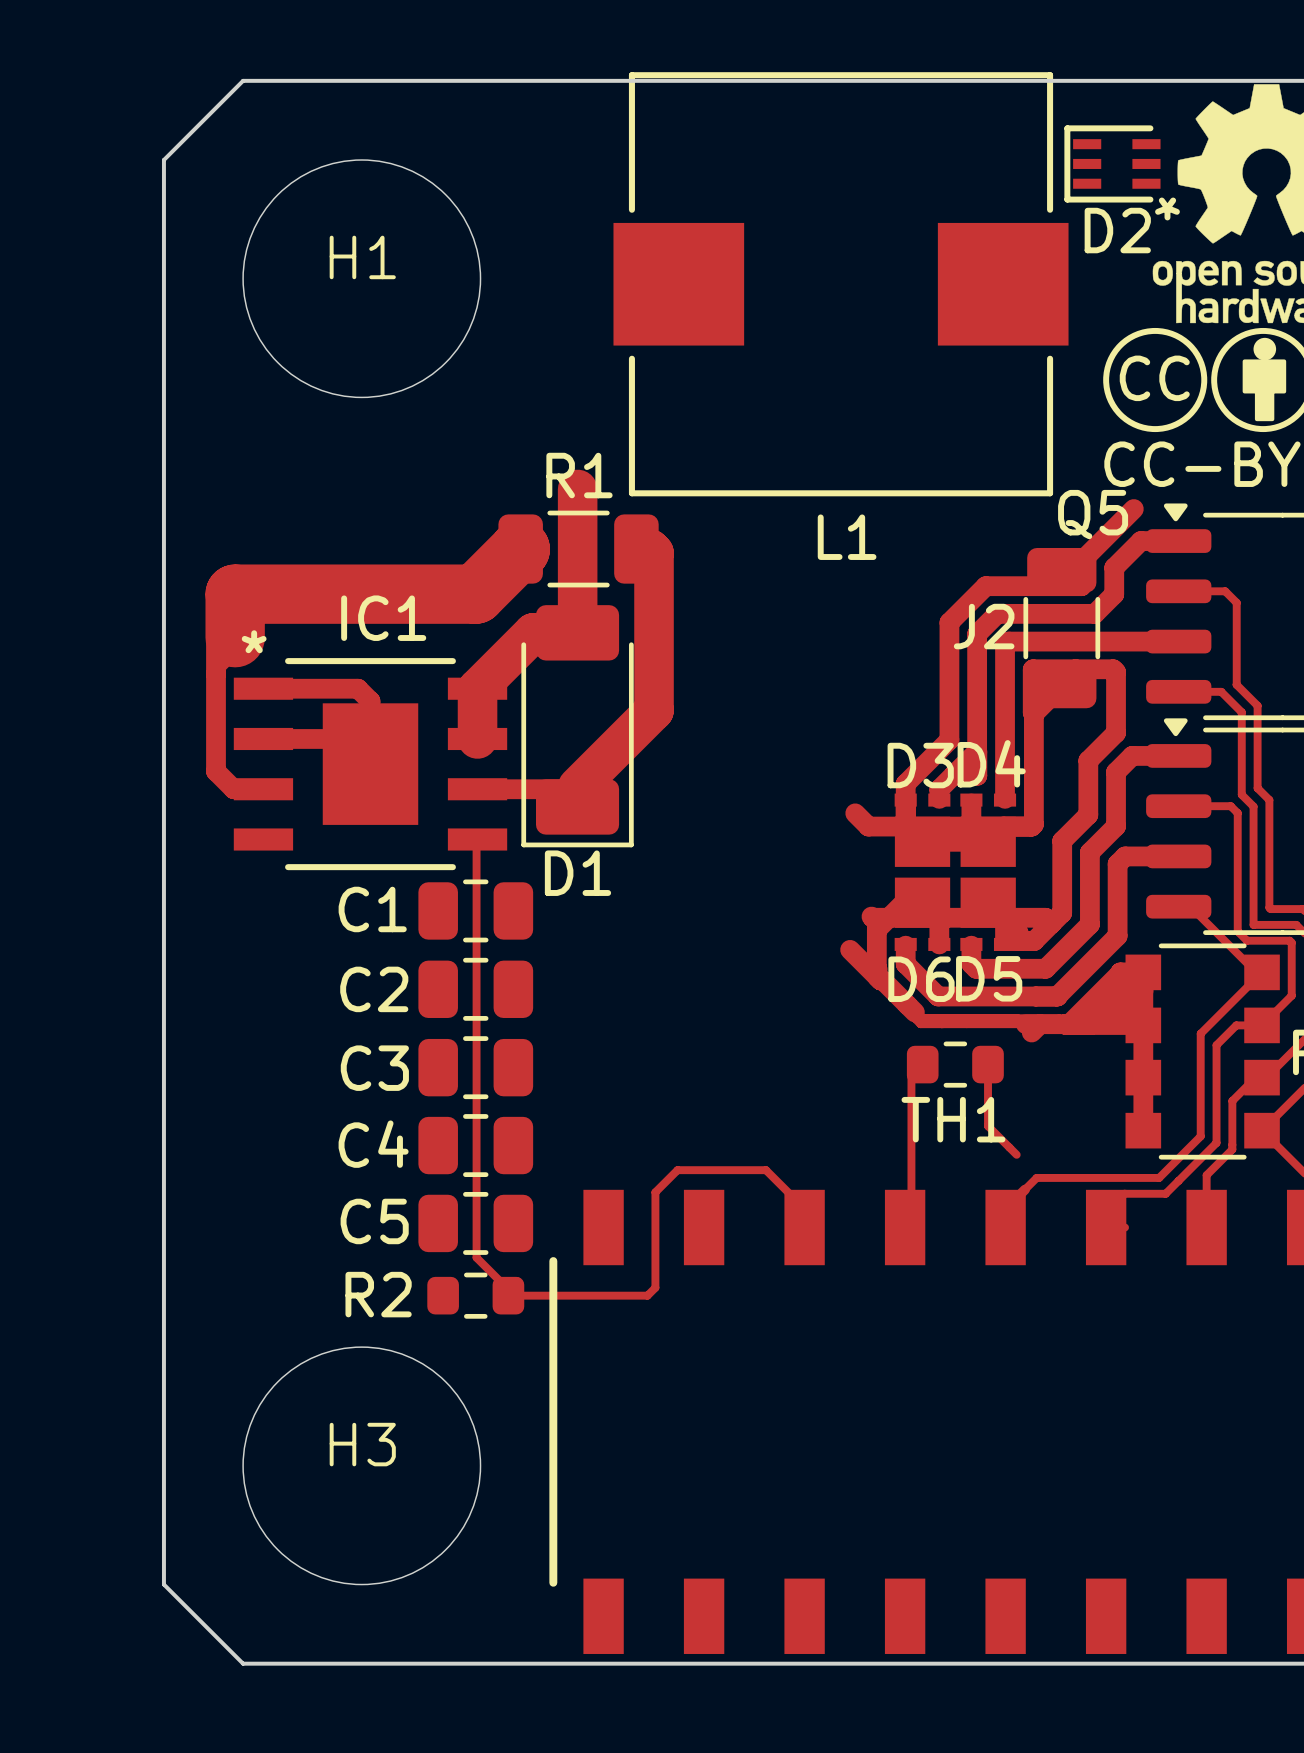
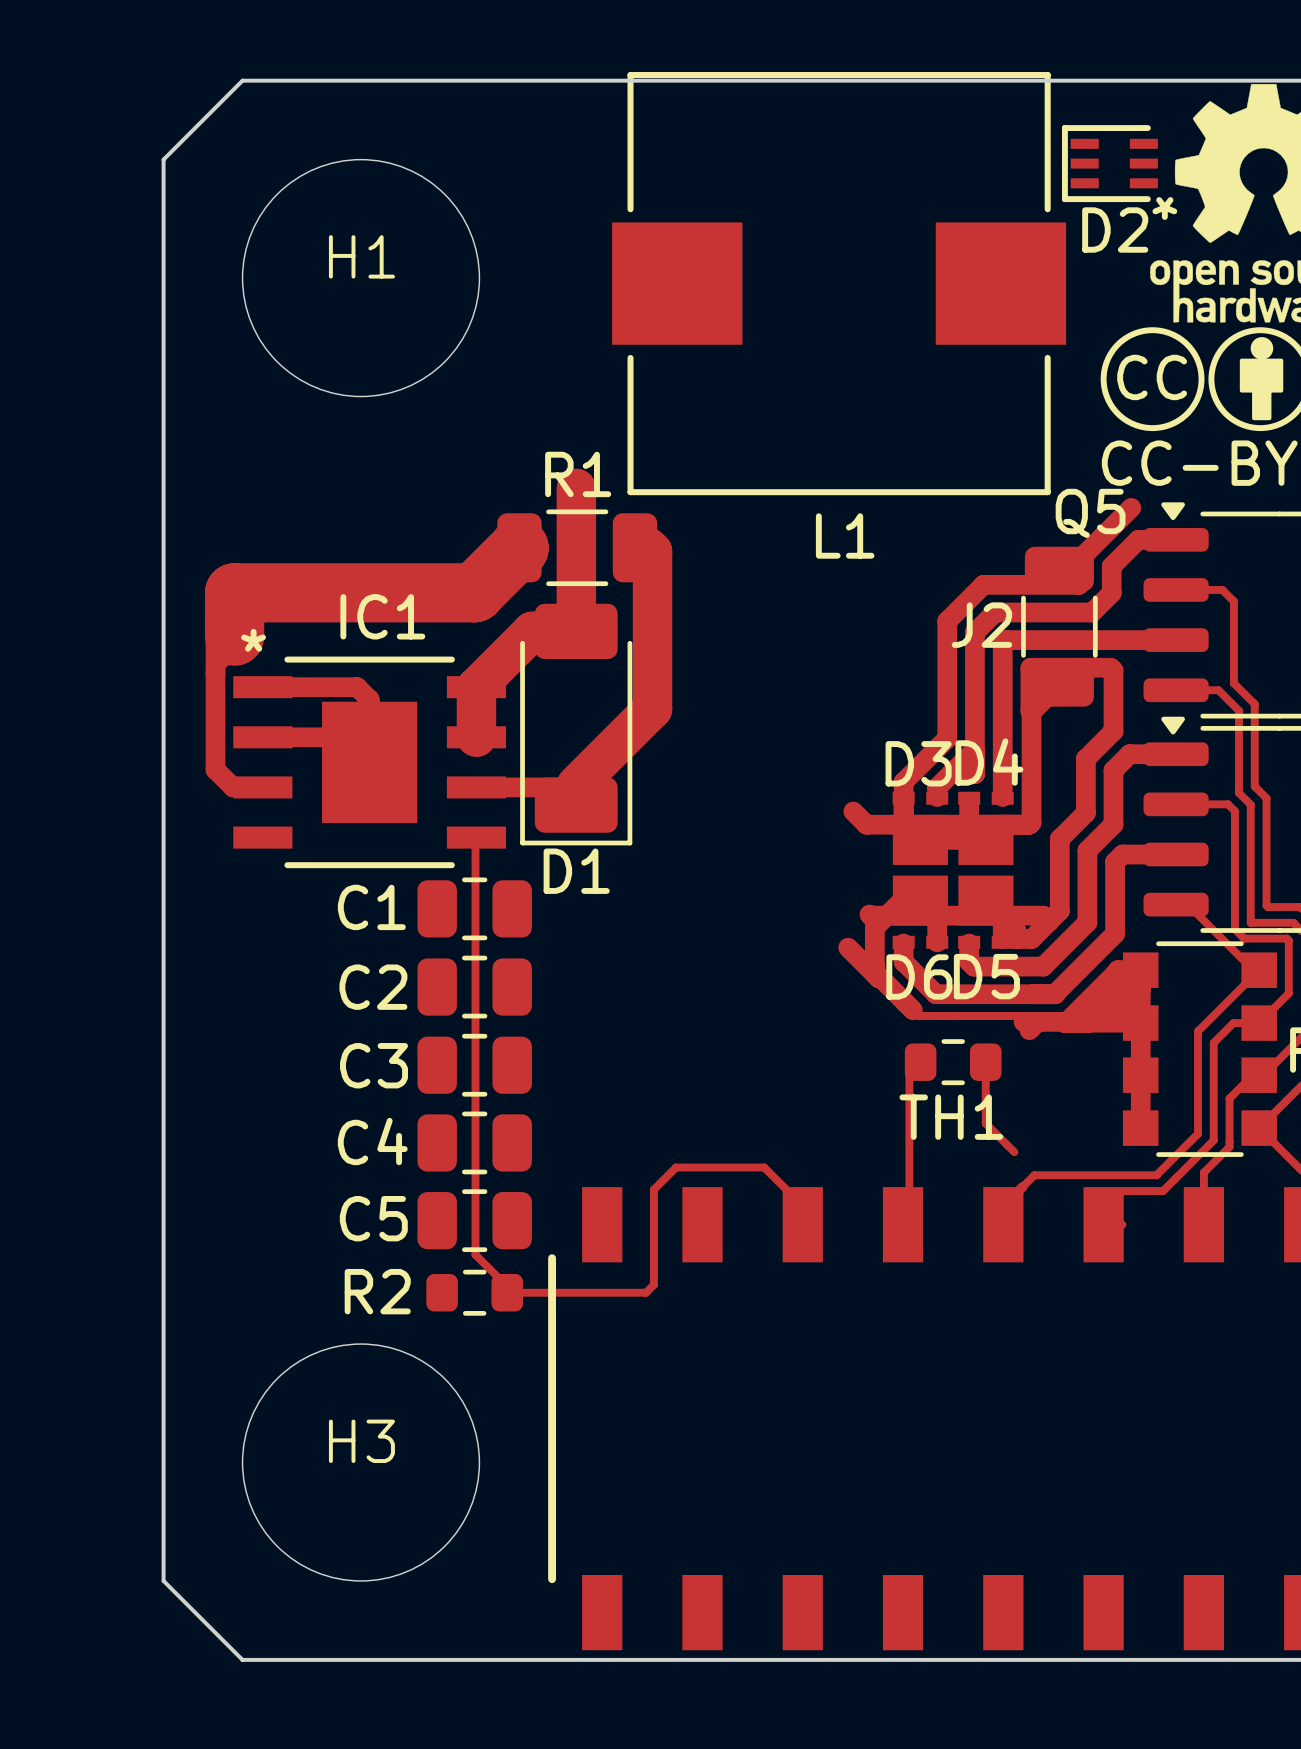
track: (914, 1018) (920, 1024) (1025, 1024) -> none

